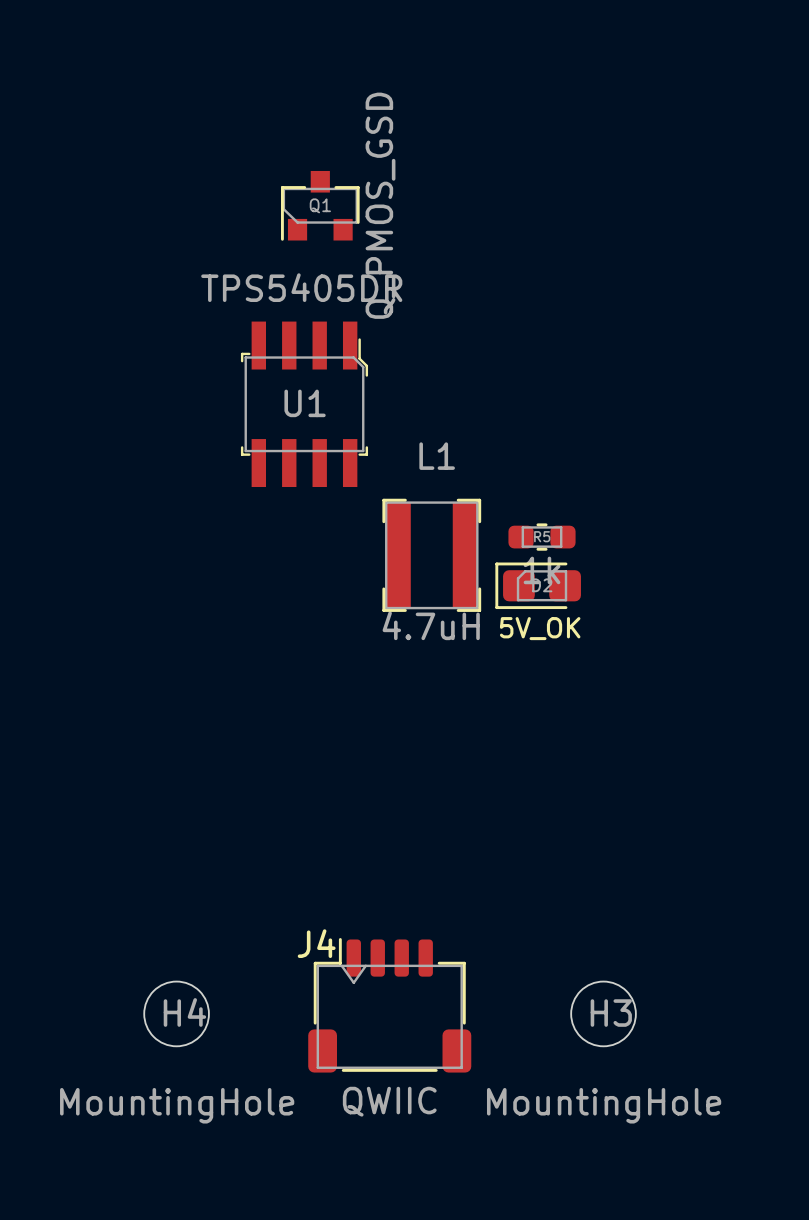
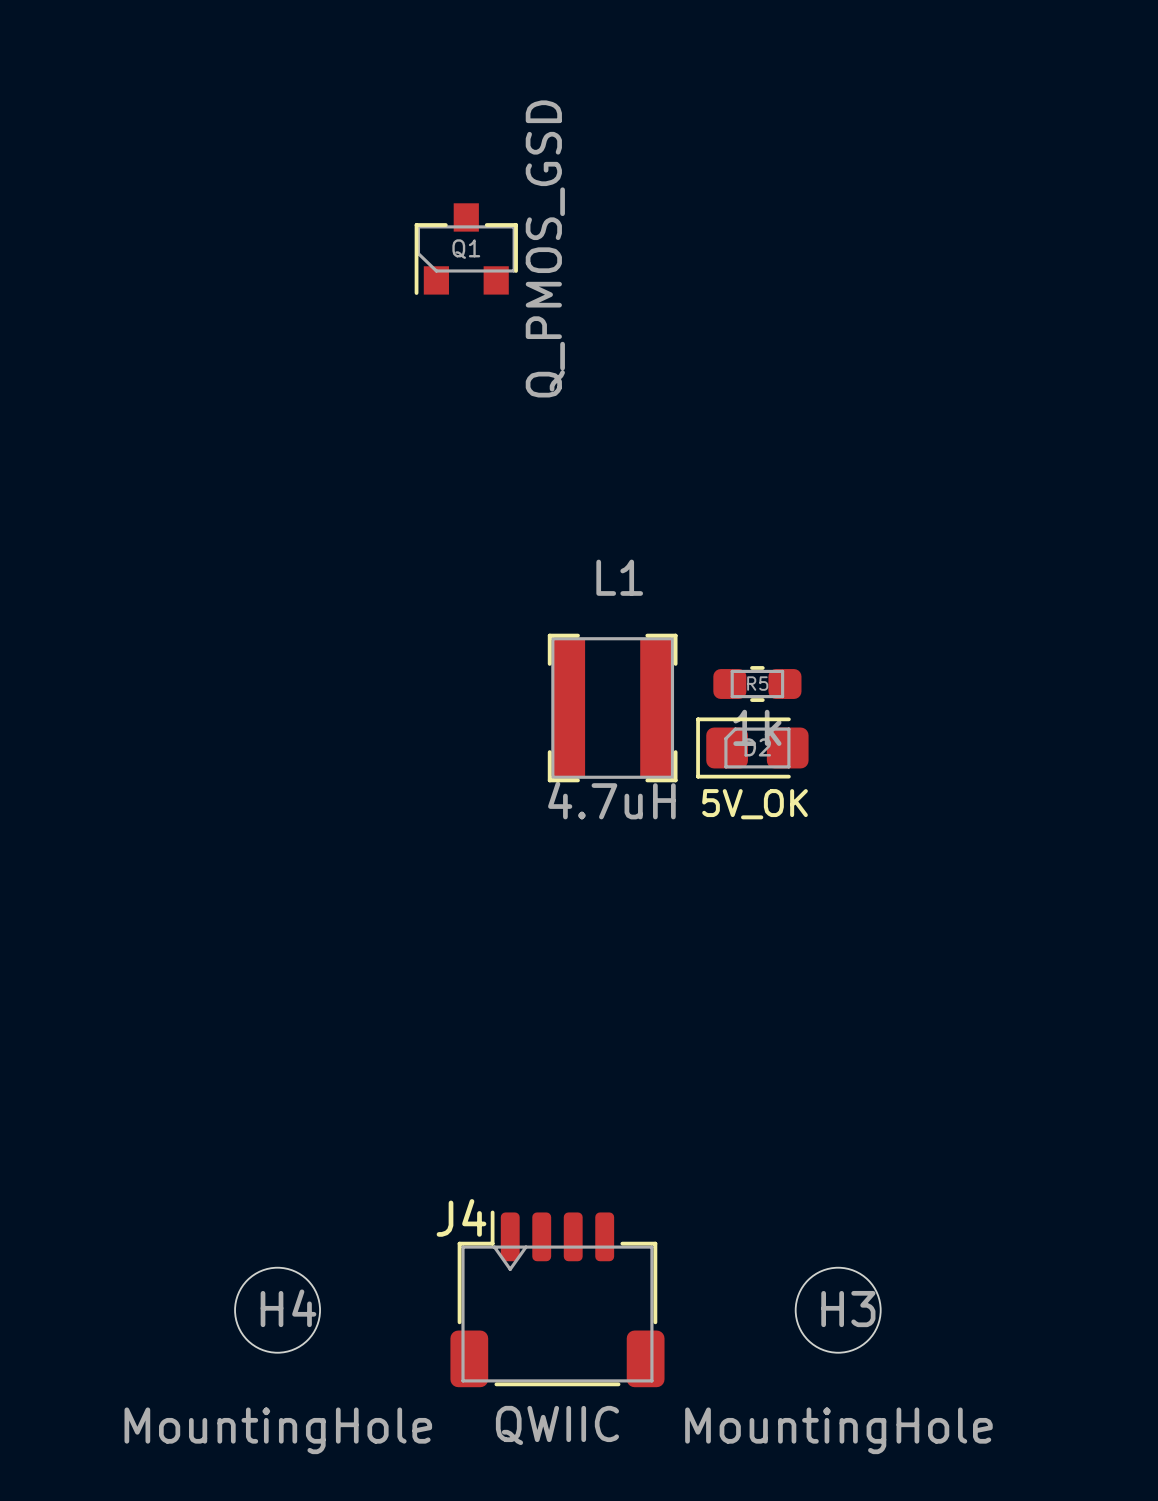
U1: TPS5405DR (304, 404) -> none

